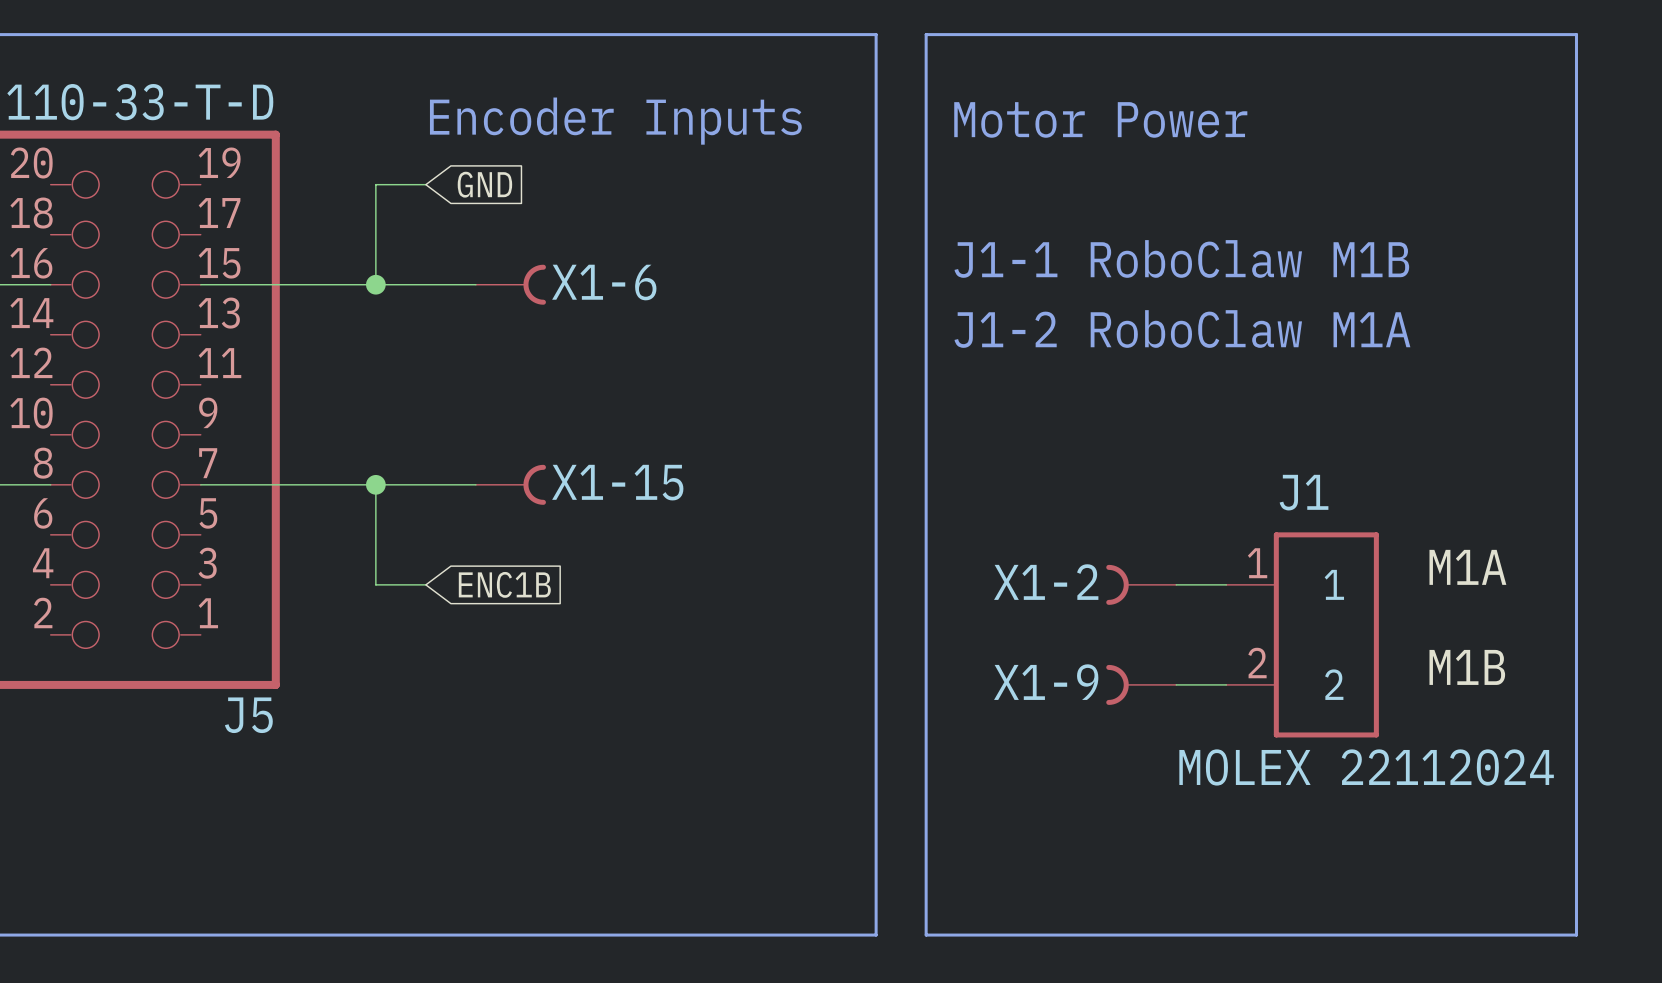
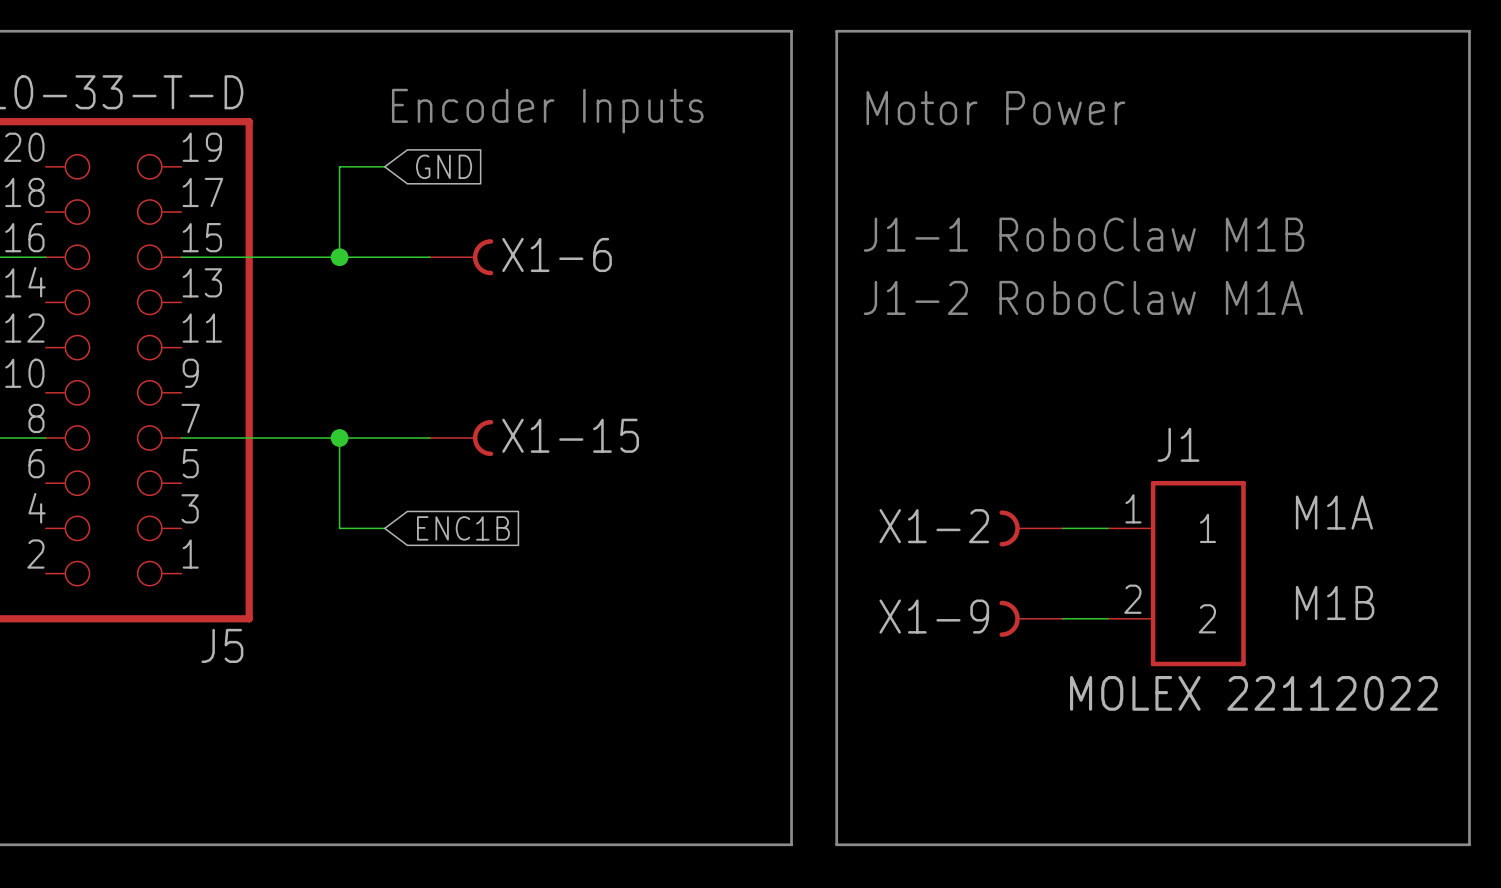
line: (1576, 34) (1576, 935) -> (1424, 31) (1469, 31) (1469, 844) (1424, 844)
J1 value: MOLEX 22112024 (1366, 767) -> MOLEX 22112022 (1253, 693)

